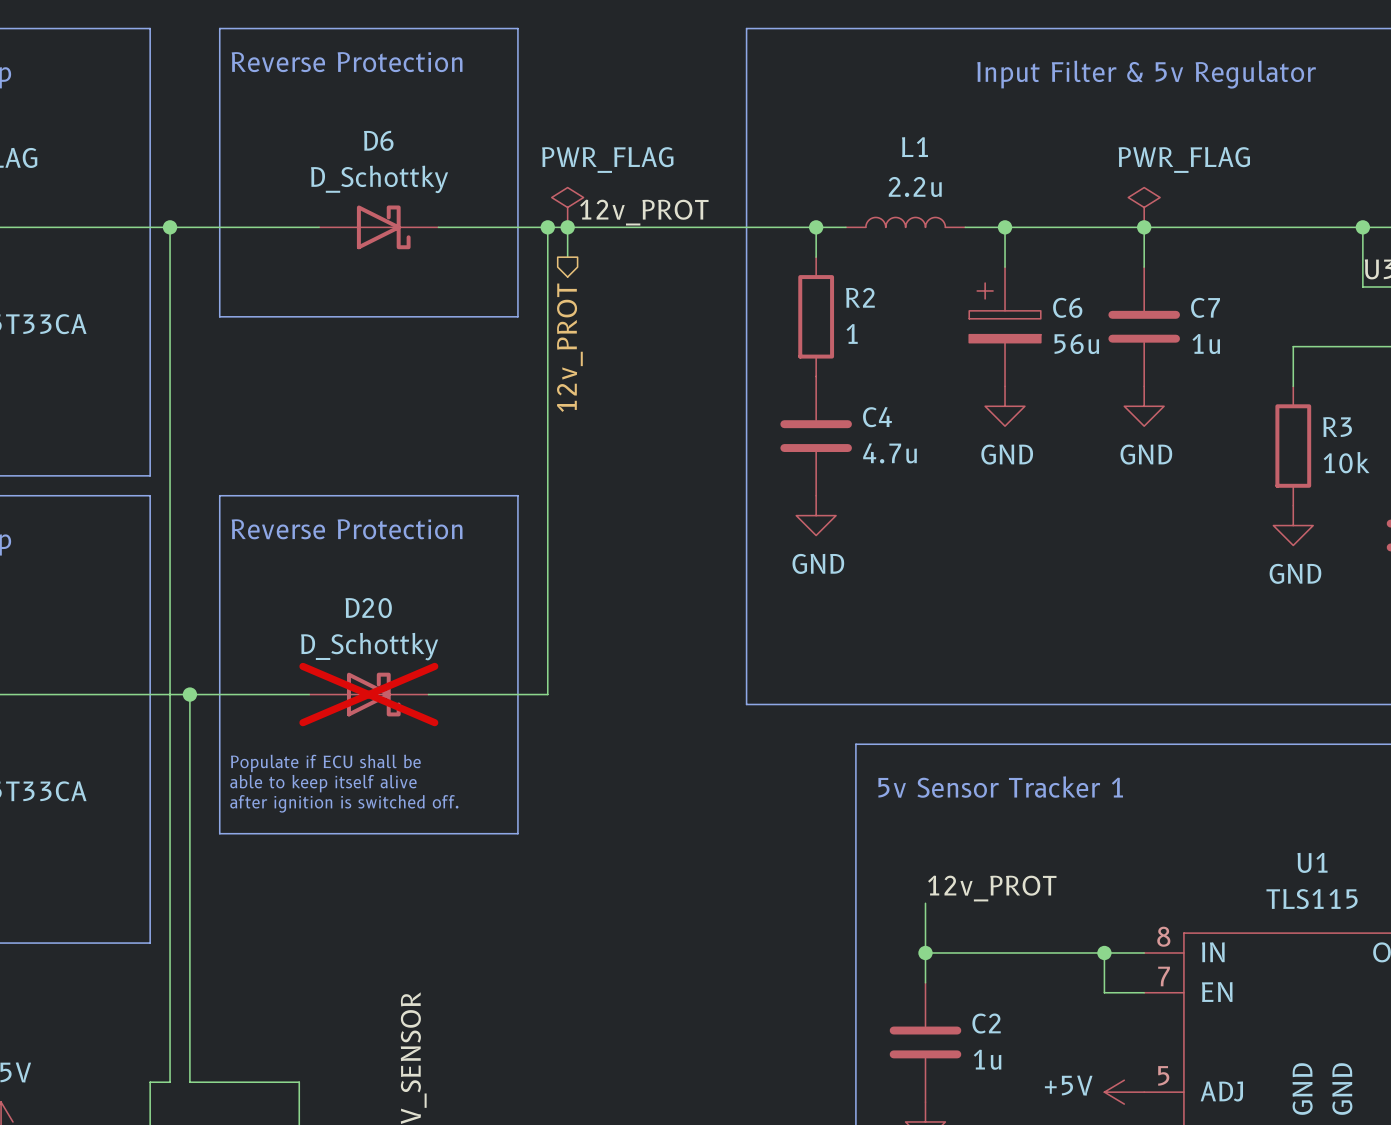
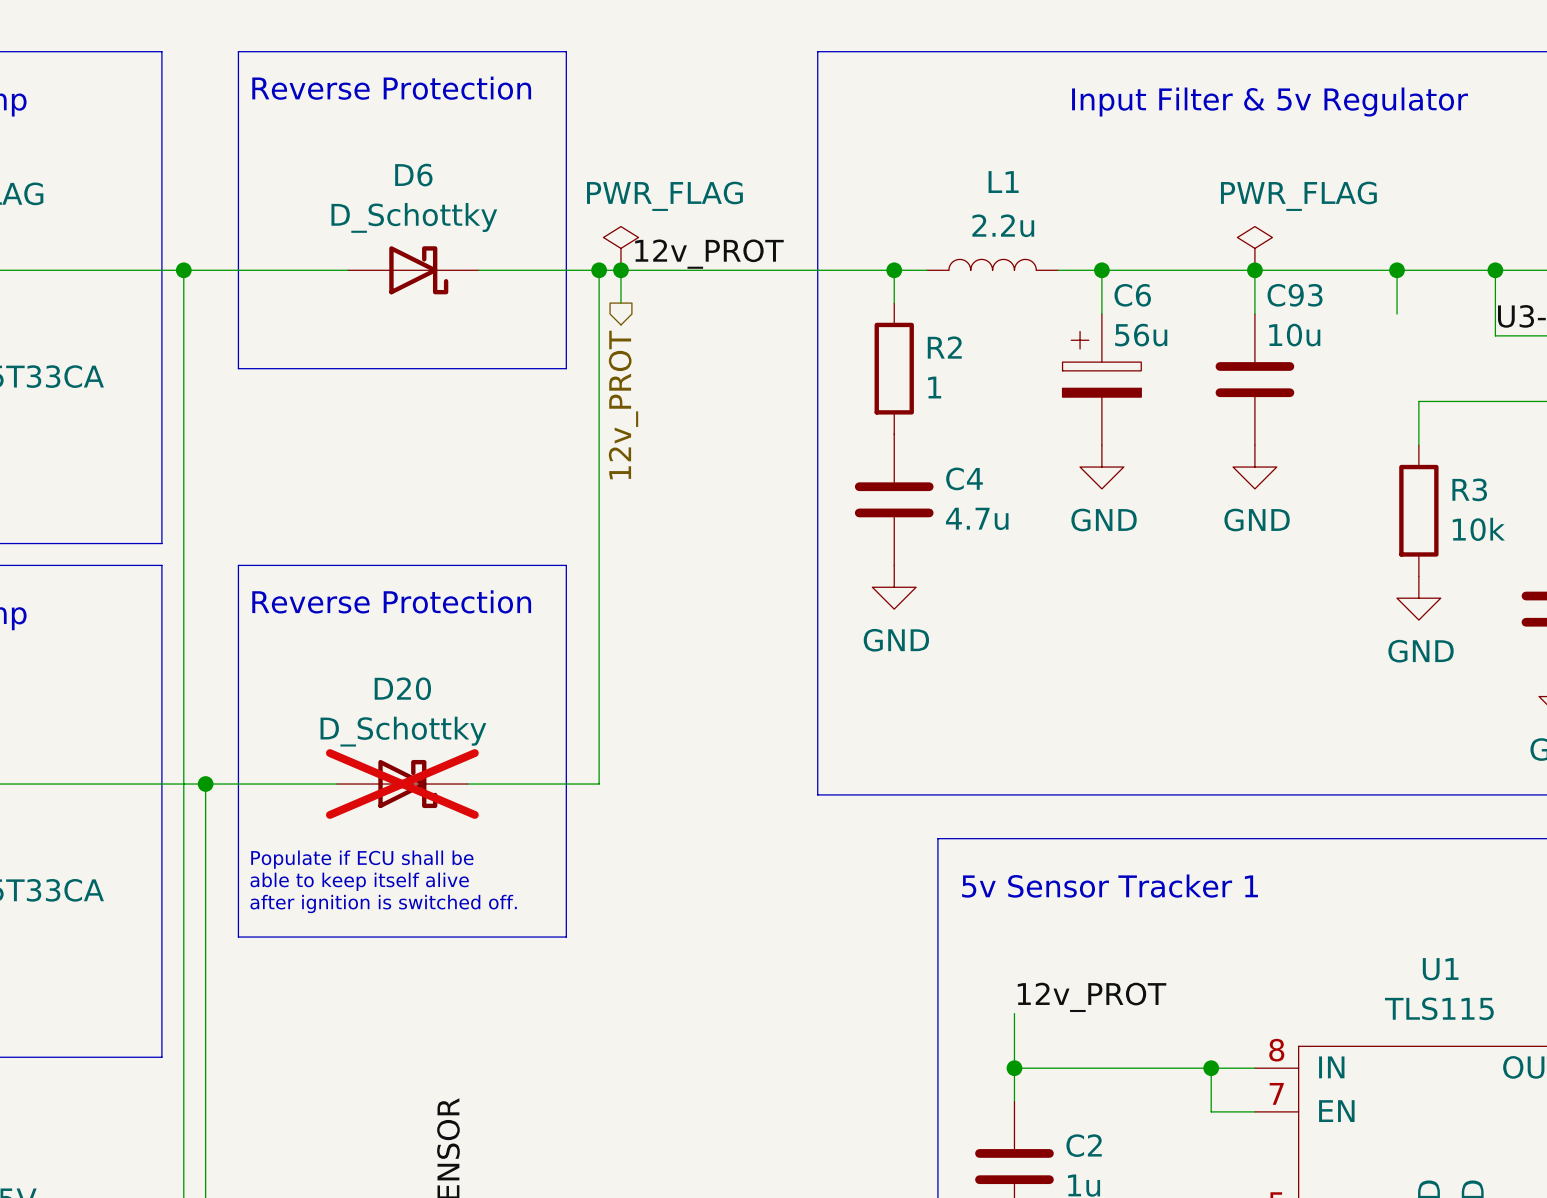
wire: none -> (1397, 270) (1397, 314)
junction: none -> (1397, 270)
C6 name position: C6 (1067, 307) -> C6 (1132, 295)
C7 name: C7 (1205, 307) -> C93 (1295, 295)
C6 value position: 56u (1076, 344) -> 56u (1141, 335)
C7 value: 1u (1206, 344) -> 10u (1294, 335)

